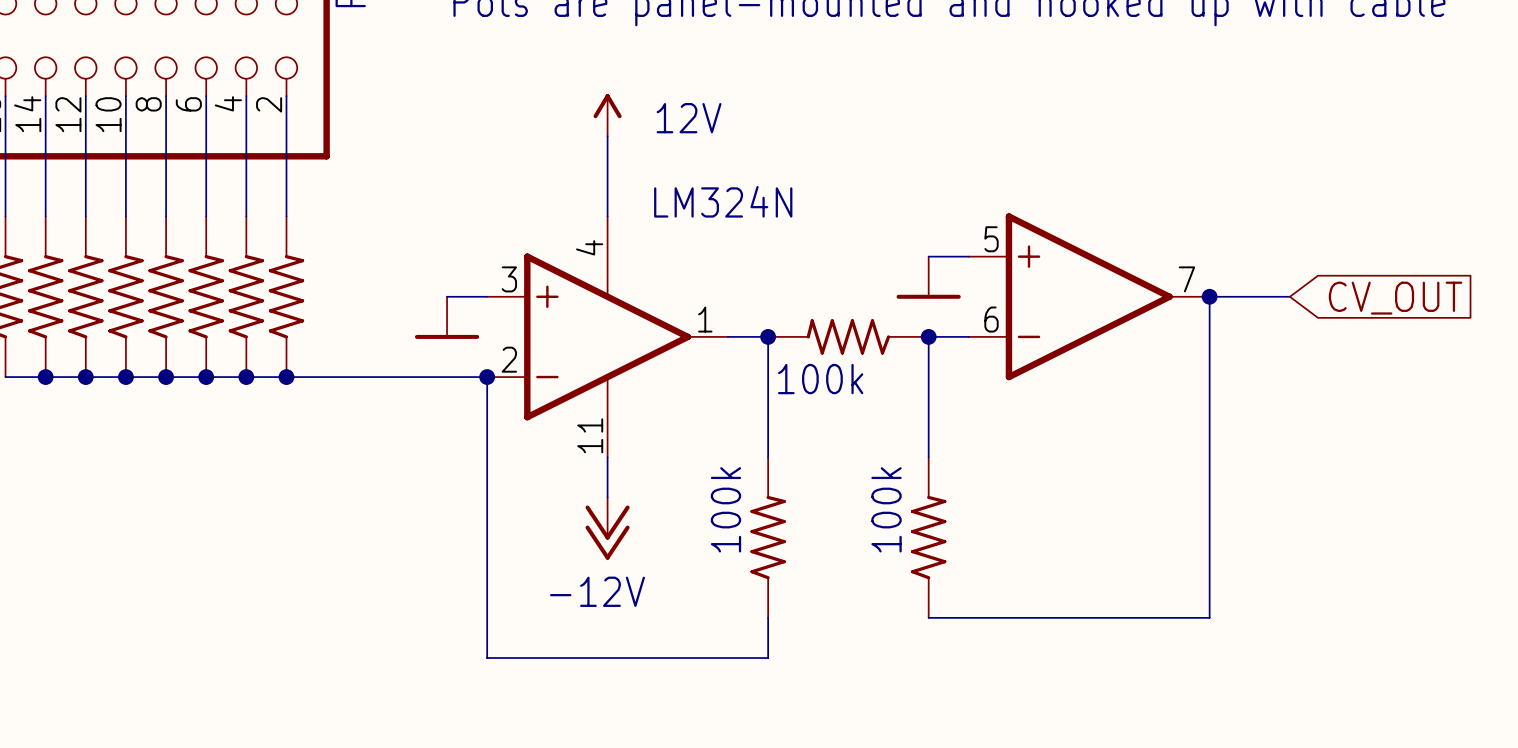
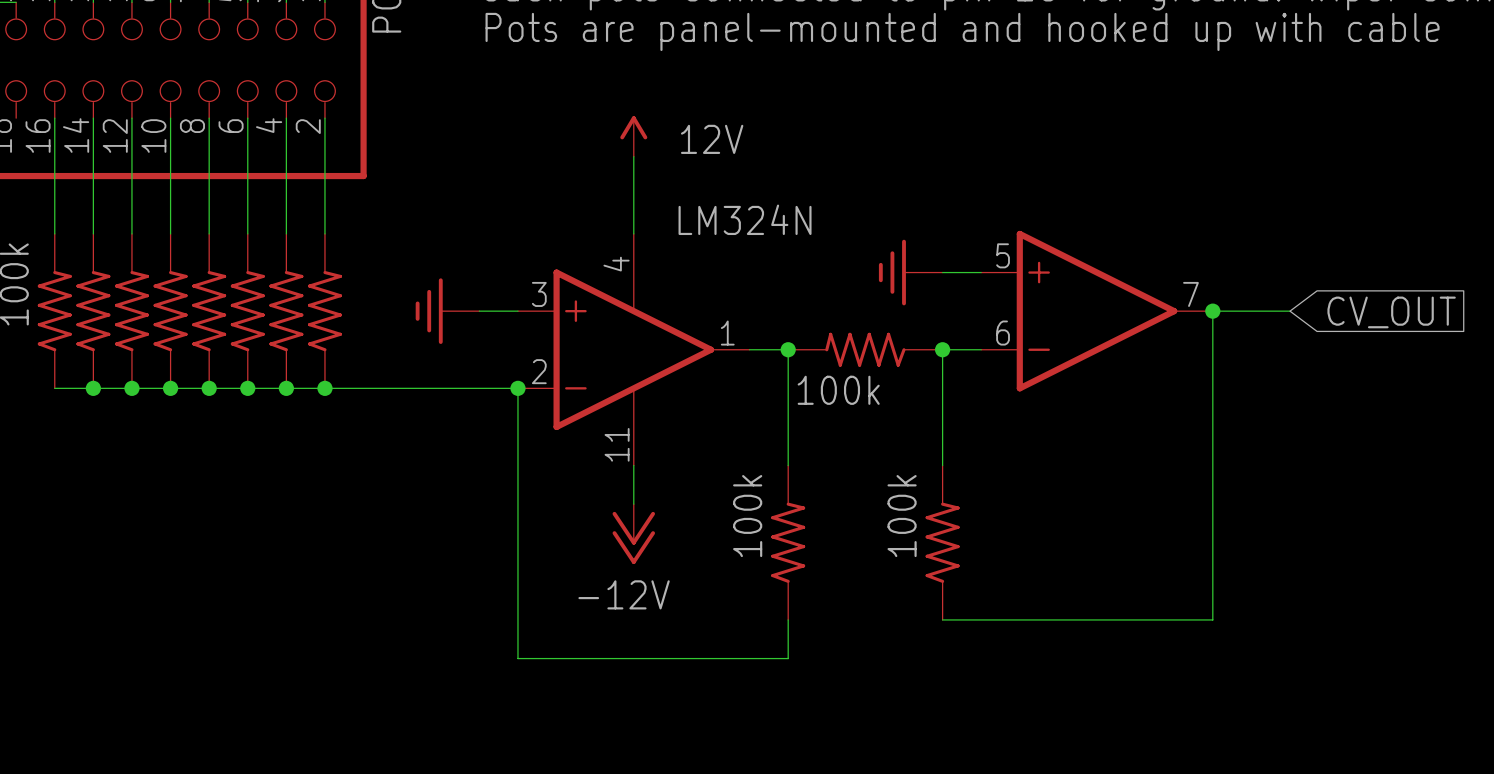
power symbol: none -> (910, 272)
power symbol: (928, 277) -> none
power symbol: none -> (447, 311)
power symbol: (447, 317) -> none

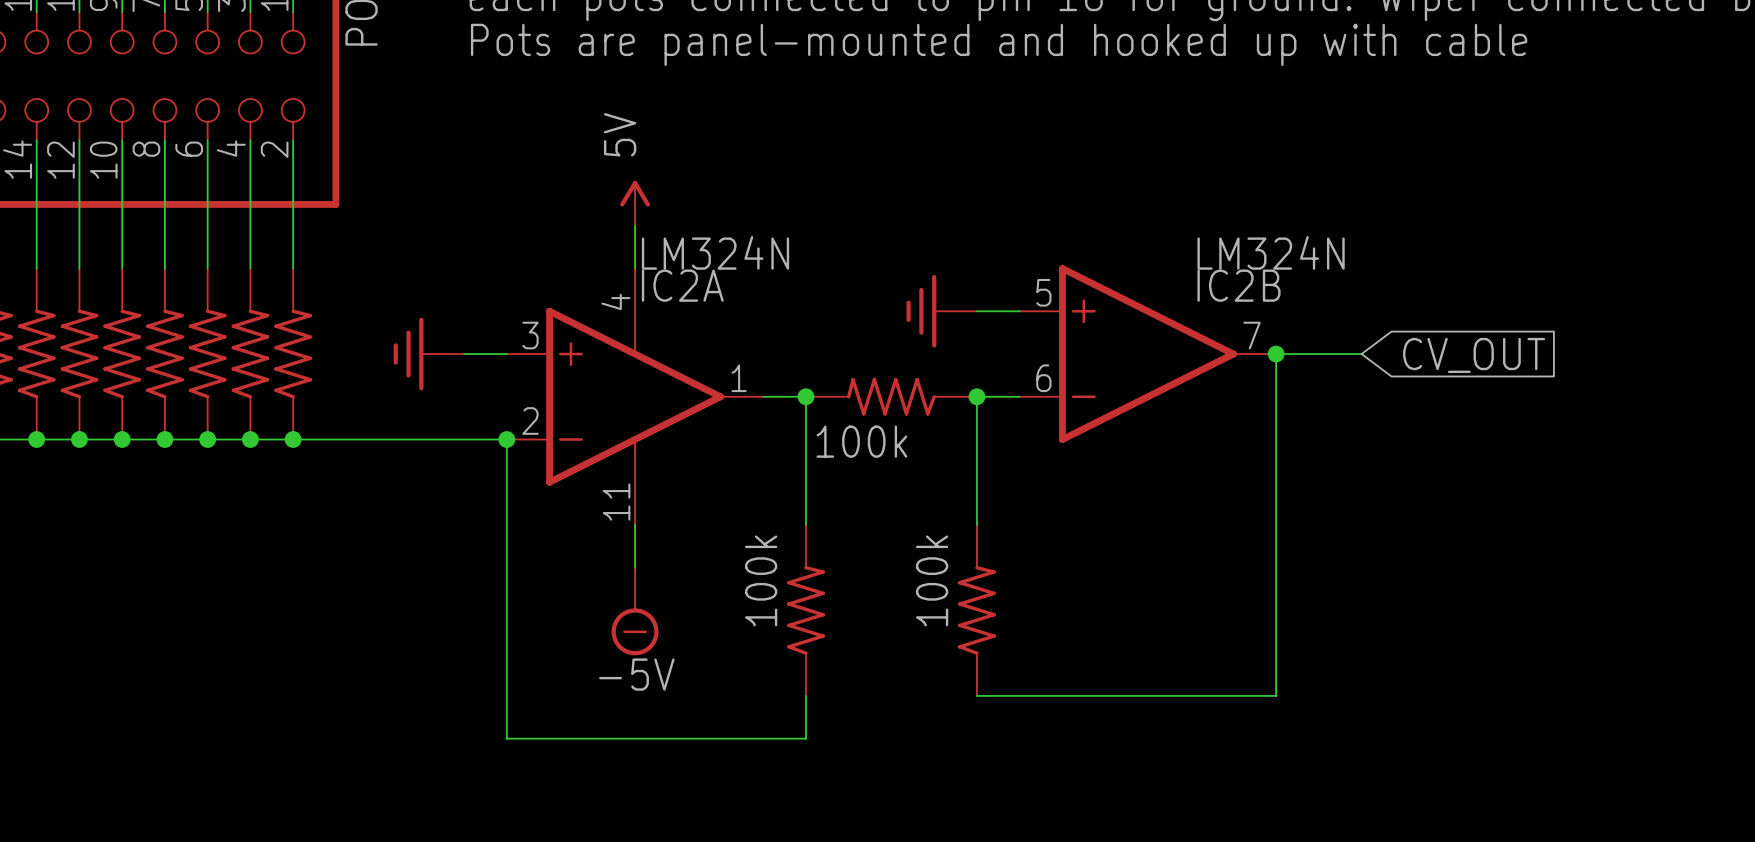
power symbol: 12V (633, 136) -> none
power symbol: none -> 5V (635, 203)
IC2A value position: LM324N (745, 219) -> LM324N (715, 252)
IC2B value: none -> LM324N (1271, 252)
IC2A name: none -> IC2A (682, 285)
IC2B name: none -> IC2B (1239, 285)
power symbol: -12V (633, 534) -> -5V (635, 611)

